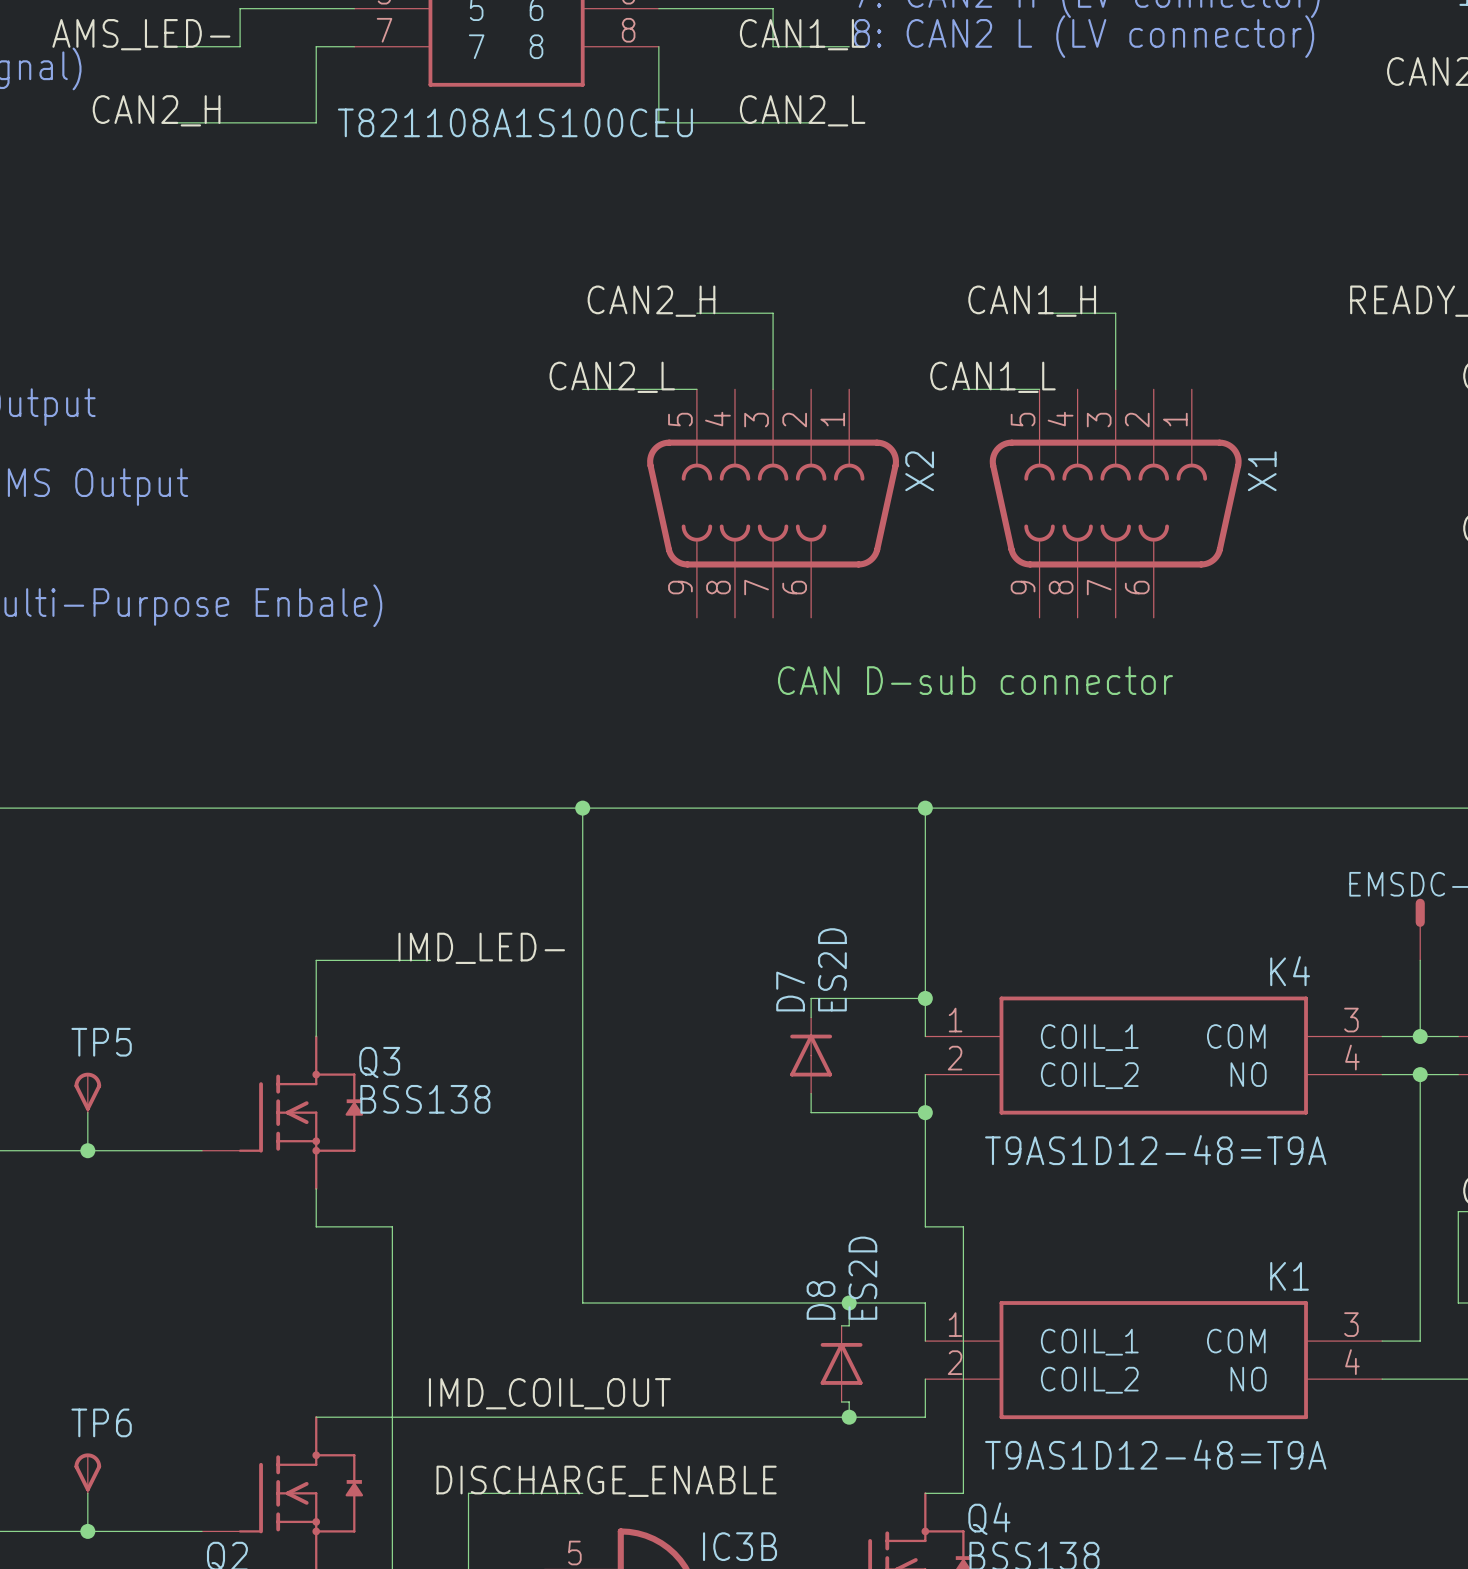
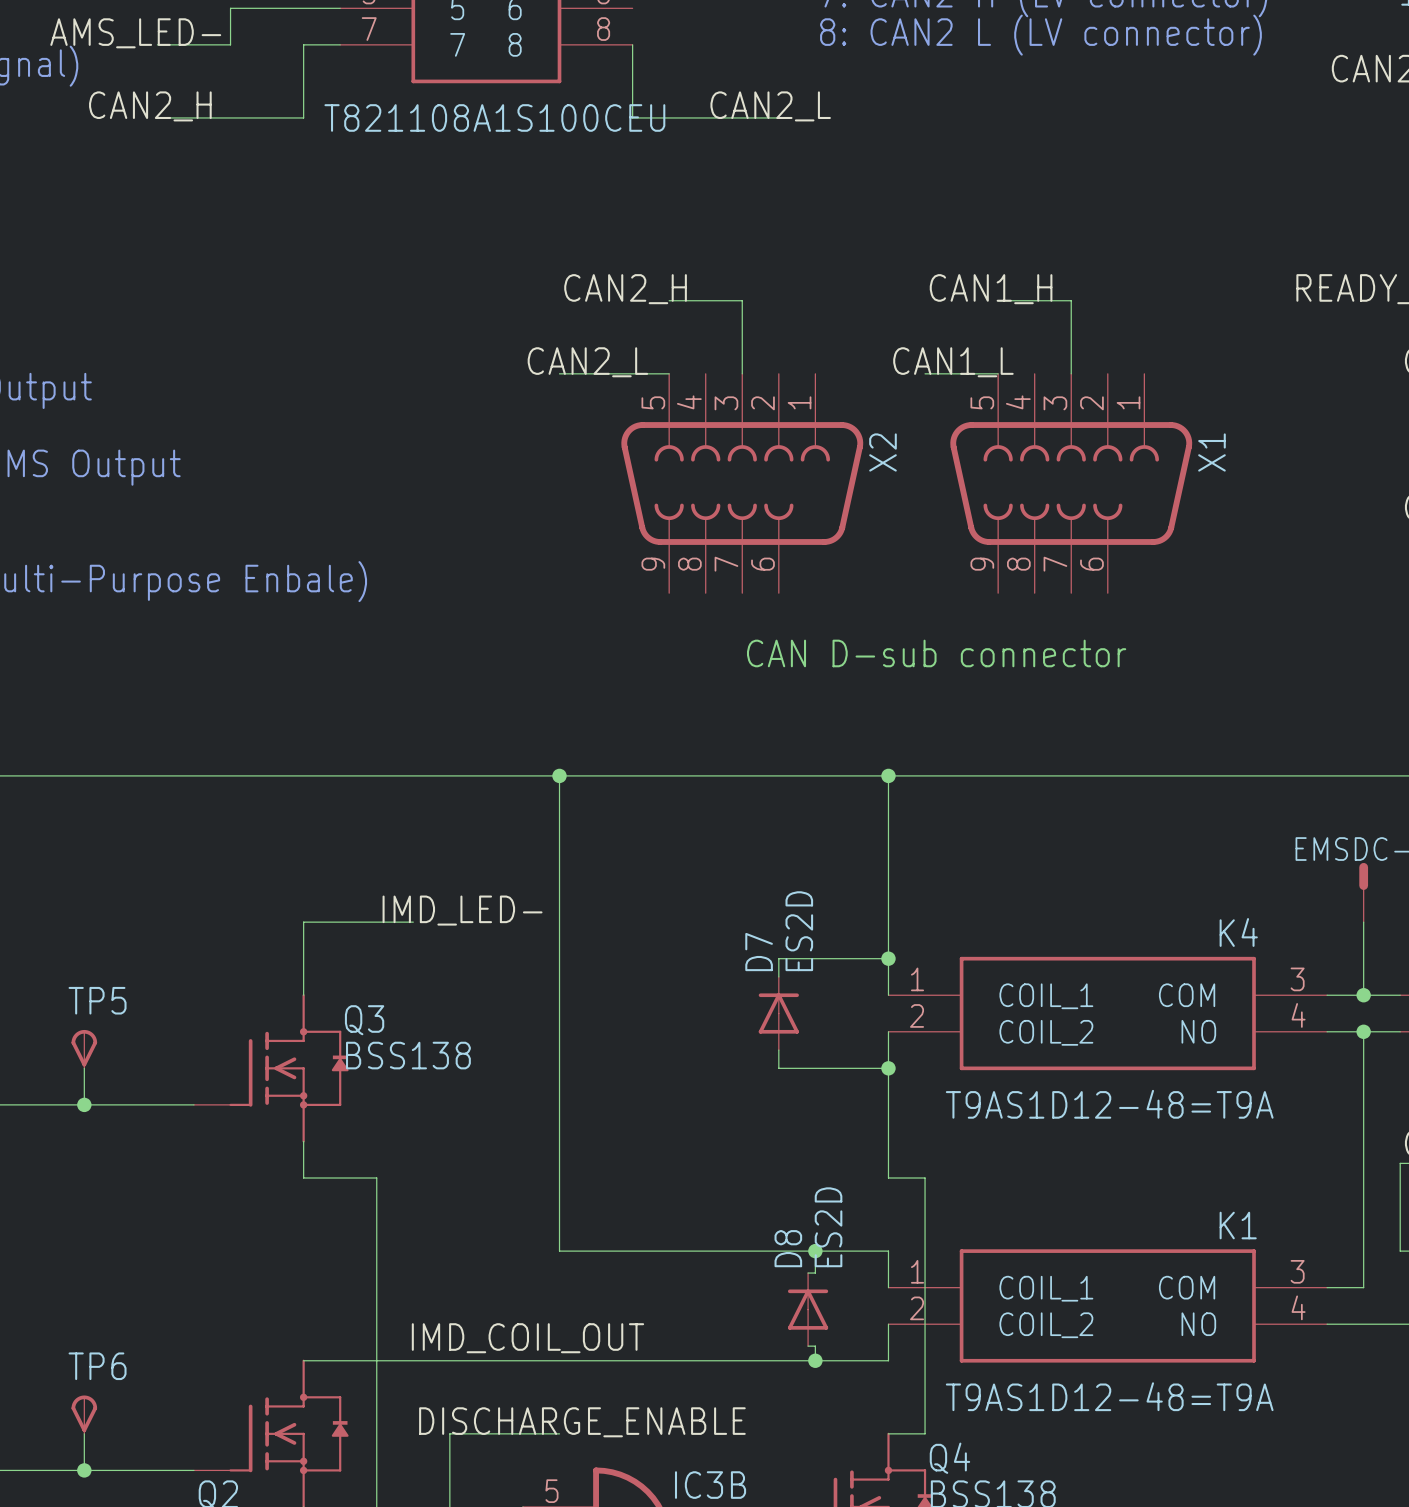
wire: (658, 8) (773, 8) (773, 46) (849, 46) -> none
label: CAN1_L (802, 34) -> none

